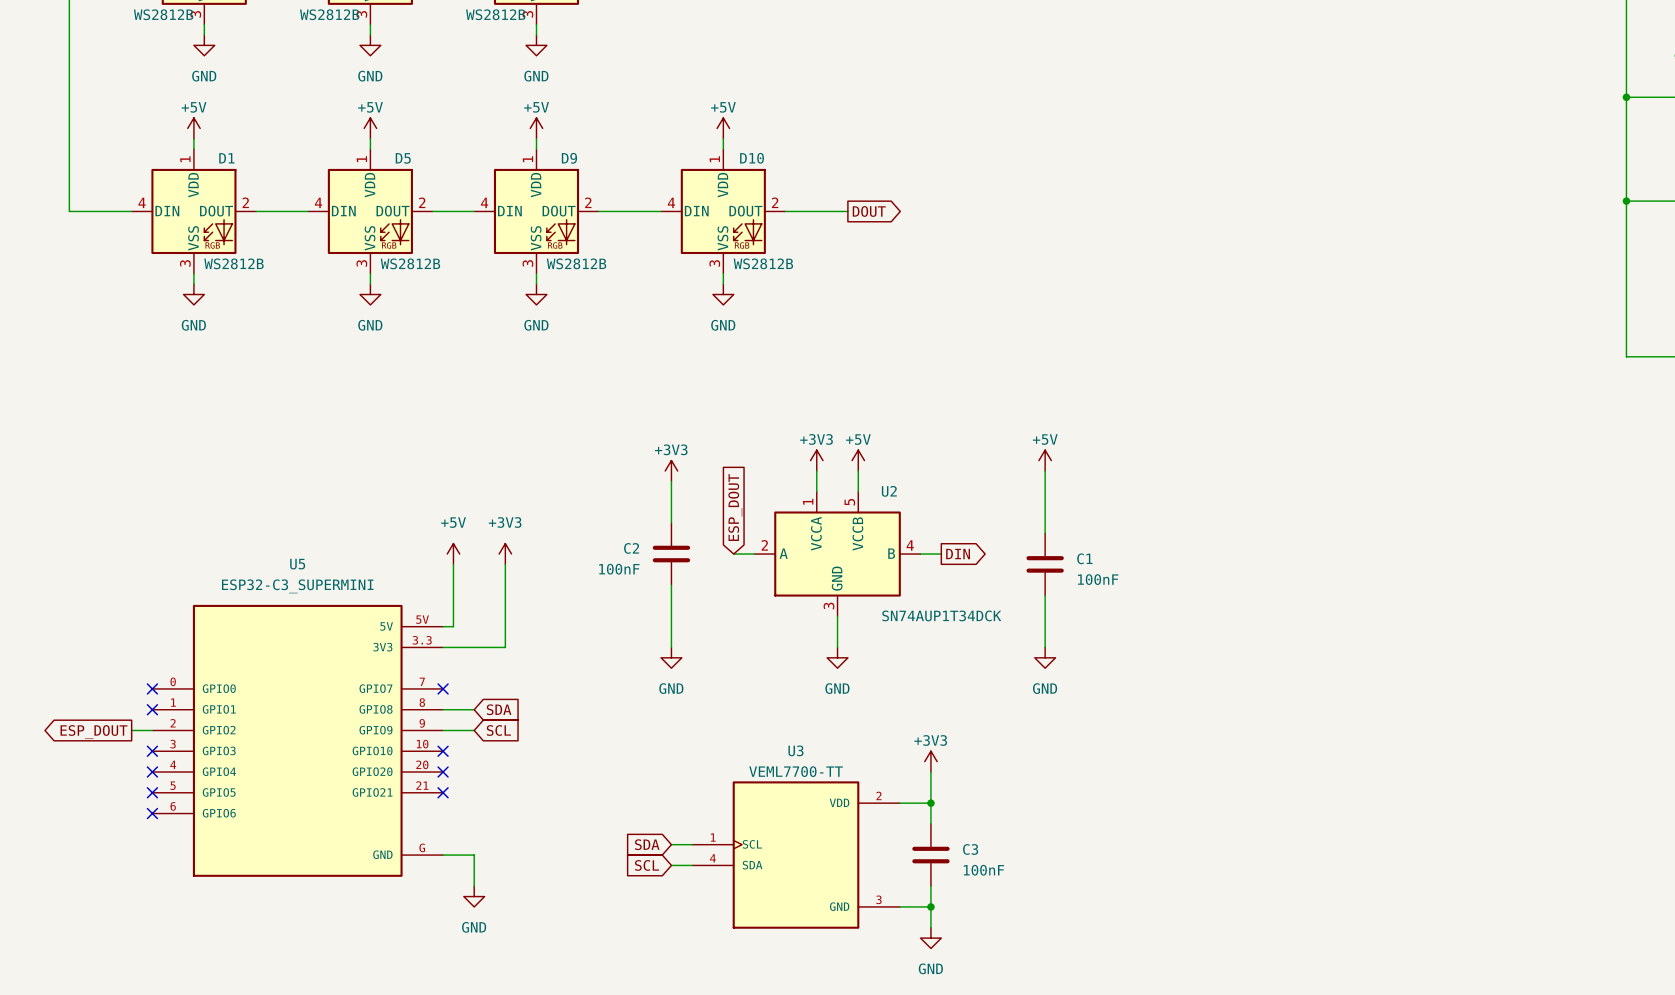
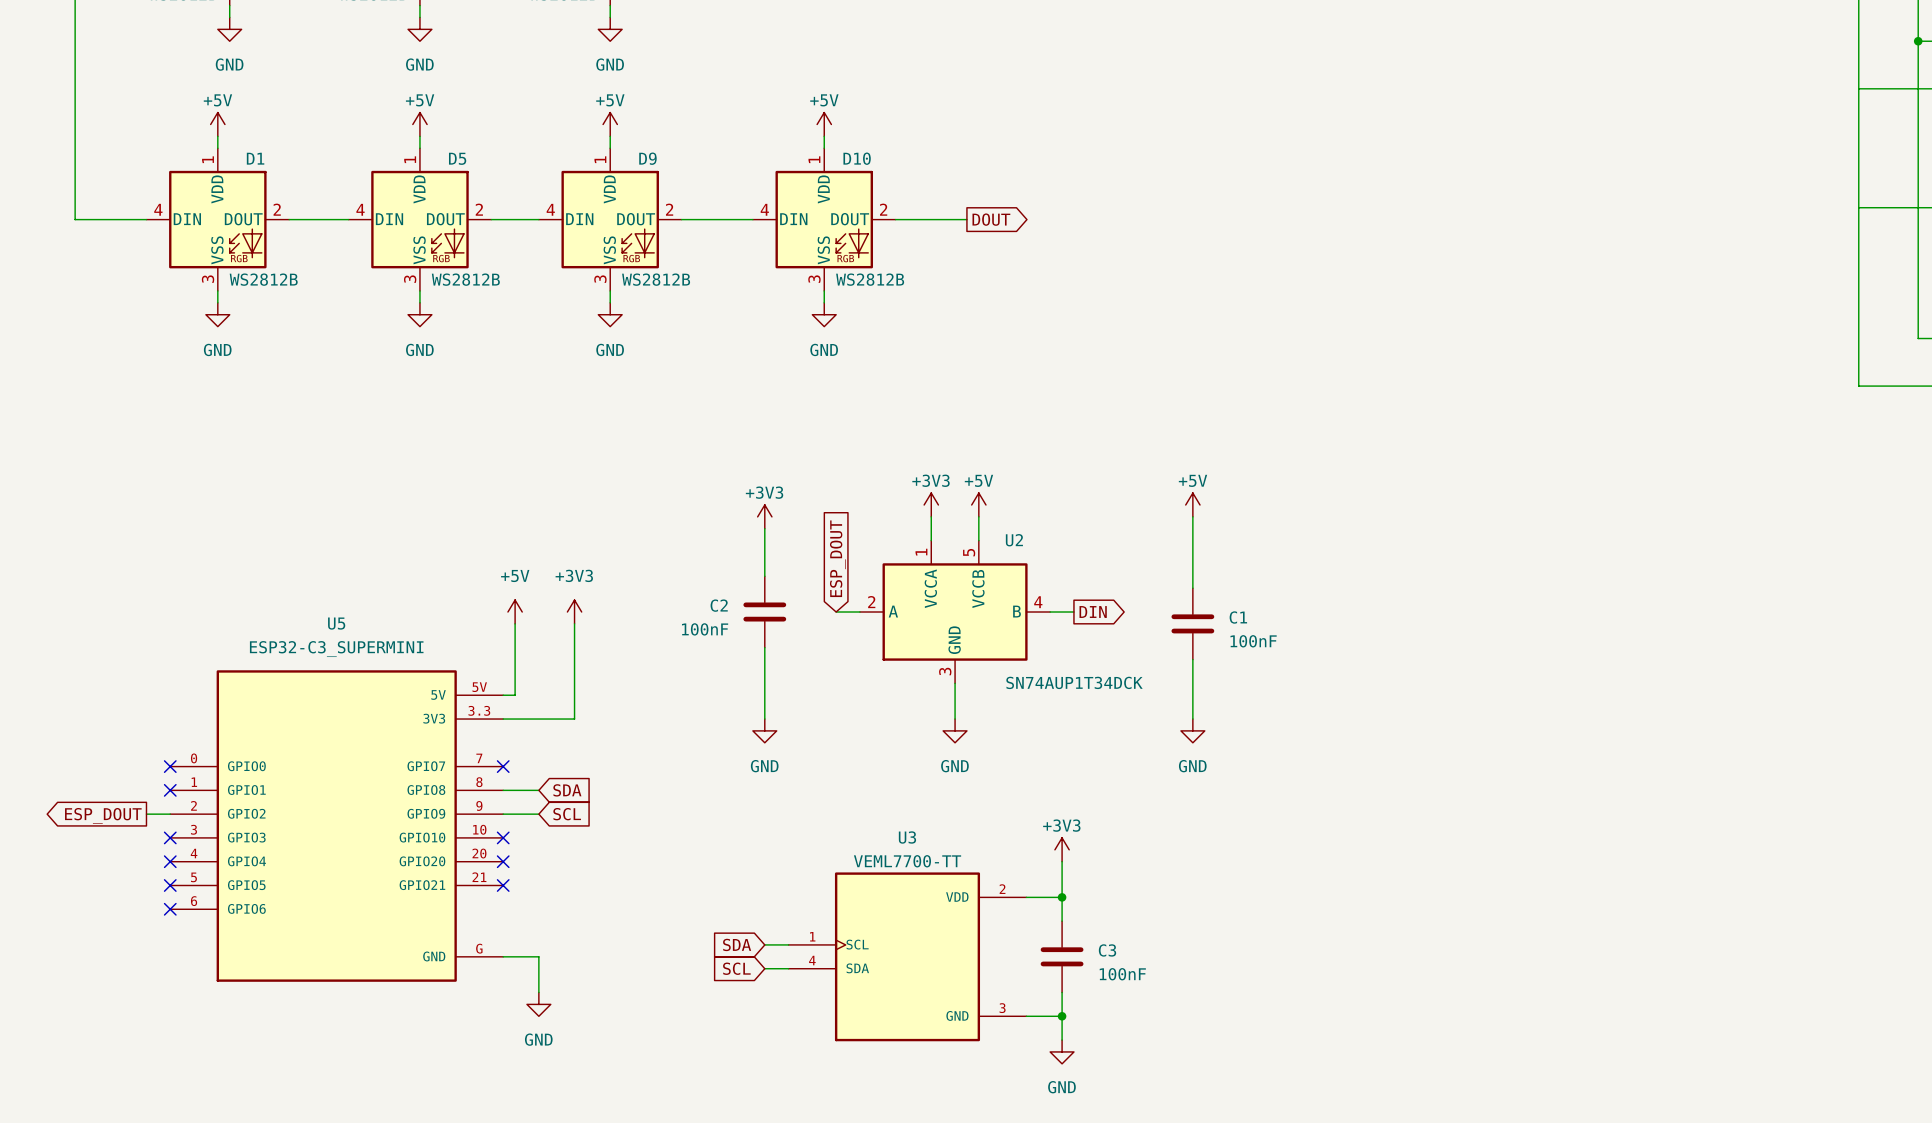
junction: (1626, 97) -> none
junction: (1626, 201) -> none

